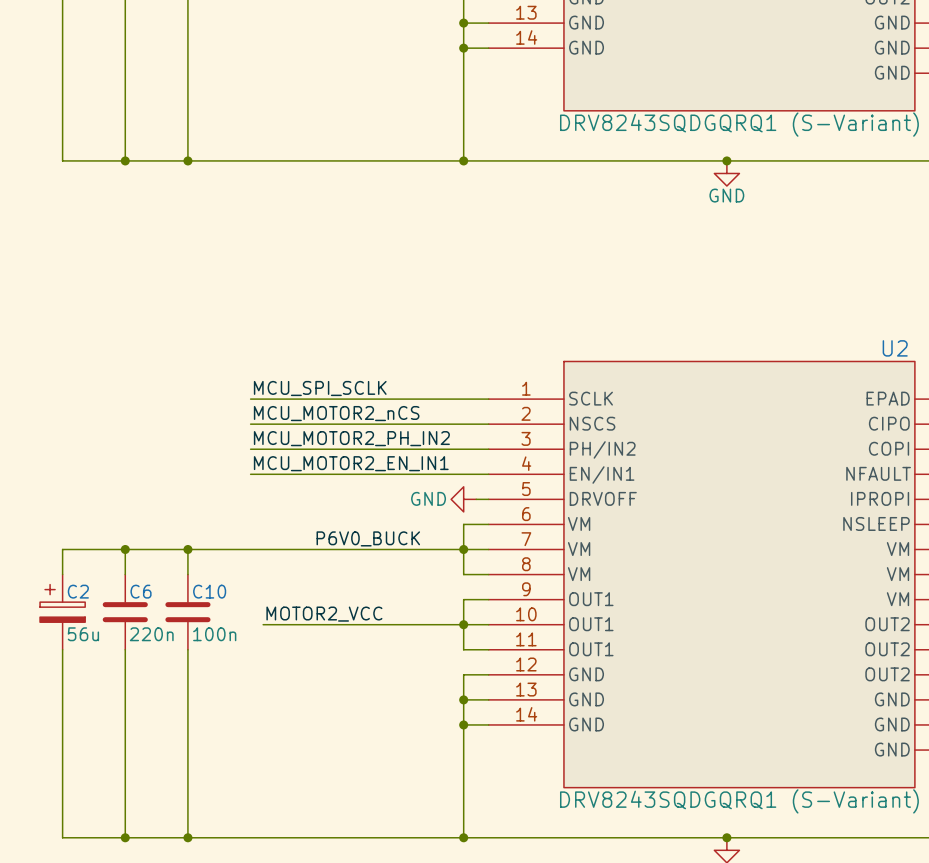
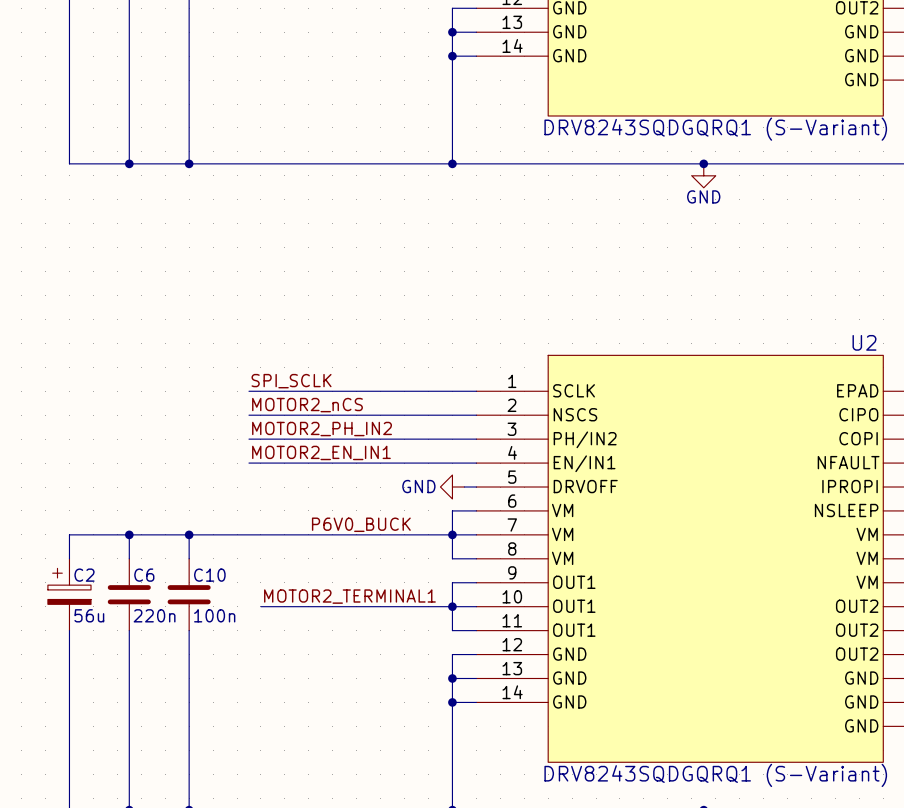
label: MCU_SPI_SCLK (320, 388) -> SPI_SCLK (291, 381)
label: MCU_MOTOR2_nCS (336, 413) -> MOTOR2_nCS (307, 405)
label: MCU_MOTOR2_PH_IN2 (351, 438) -> MOTOR2_PH_IN2 (322, 429)
label: MCU_MOTOR2_EN_IN1 (351, 463) -> MOTOR2_EN_IN1 (321, 452)
label: MOTOR2_VCC (324, 614) -> MOTOR2_TERMINAL1 (349, 596)

